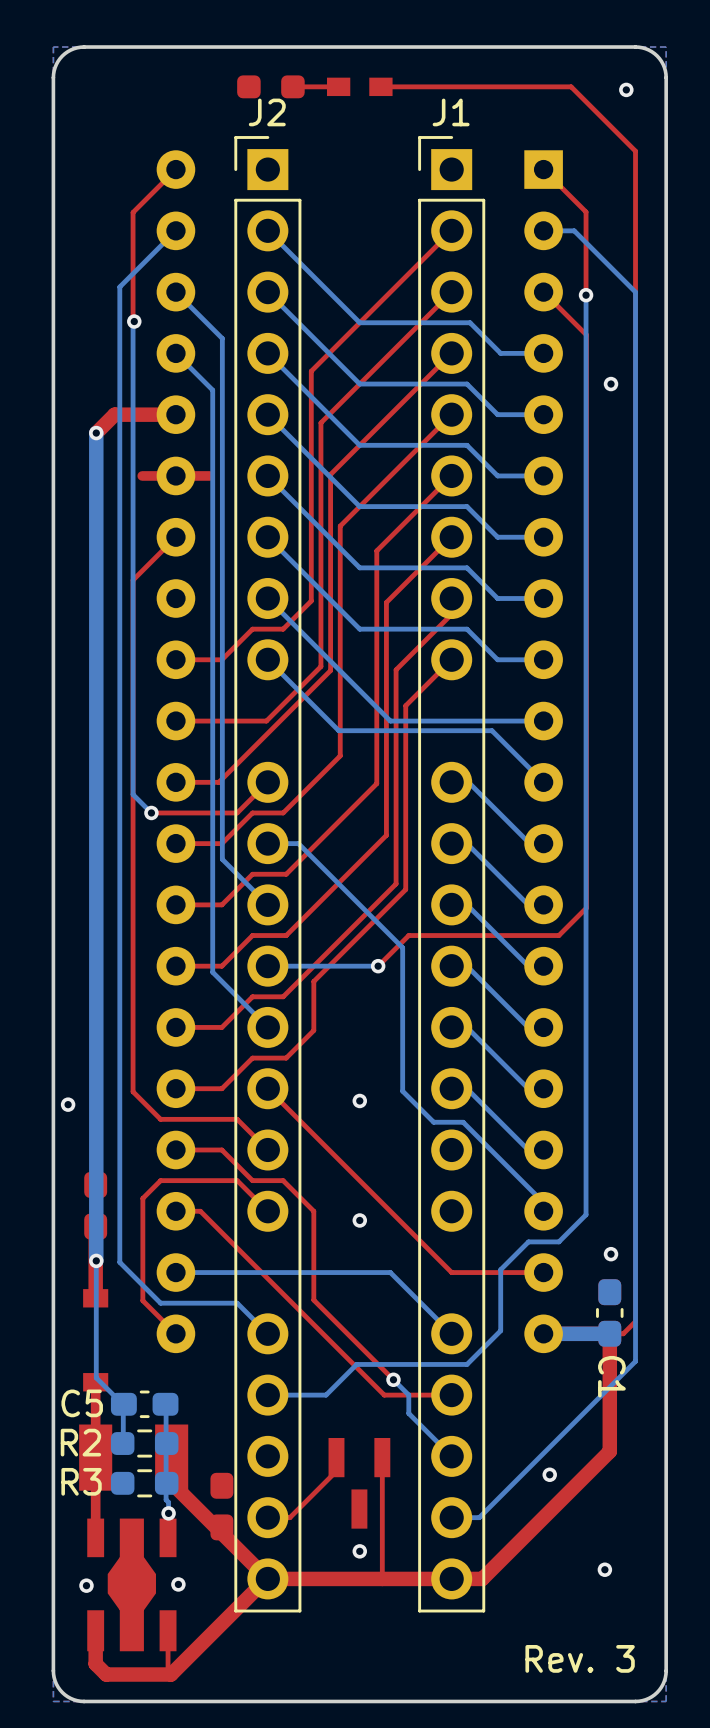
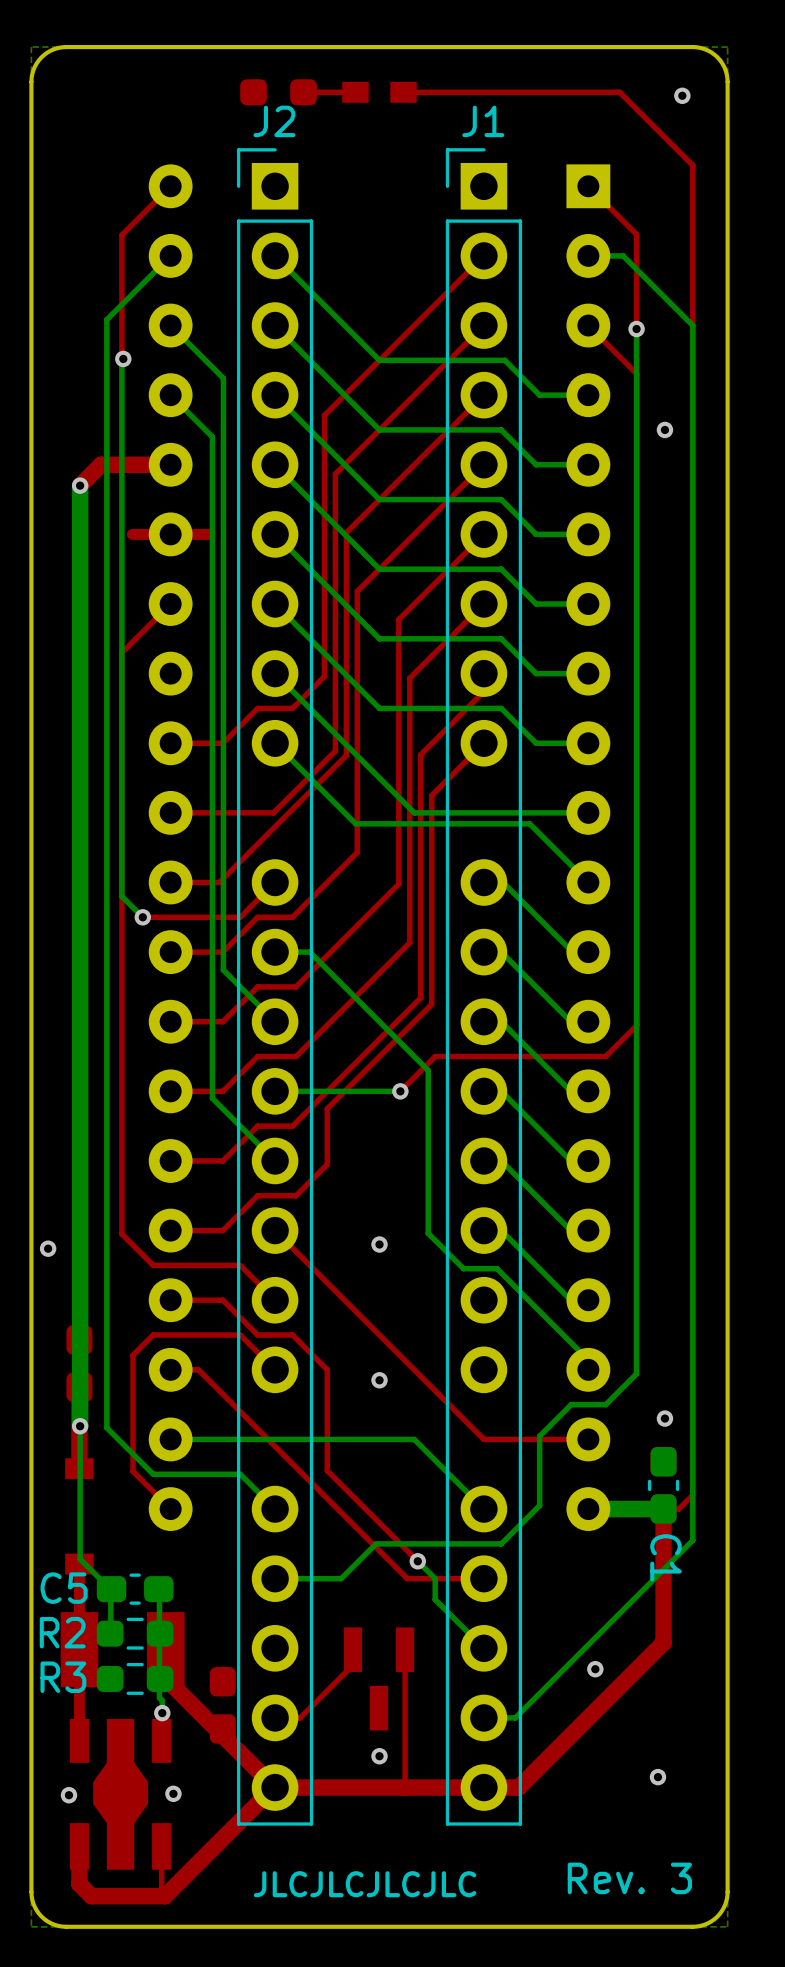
text: none -> JLCJLCJLCJLC (365, 1884)

